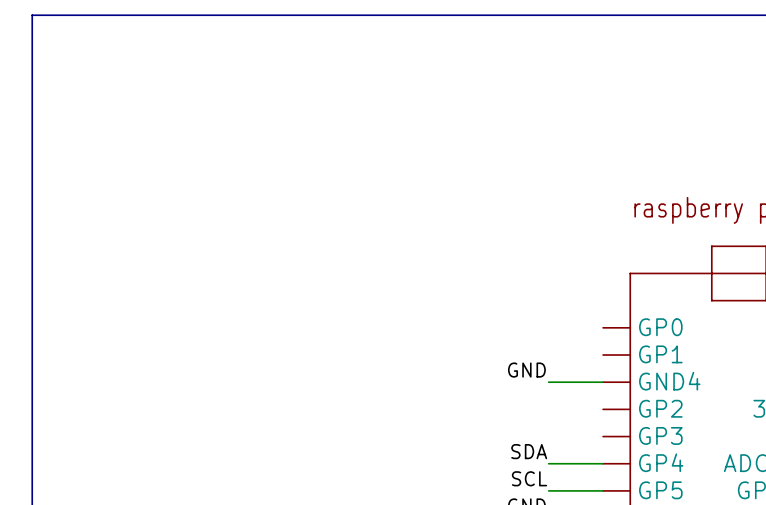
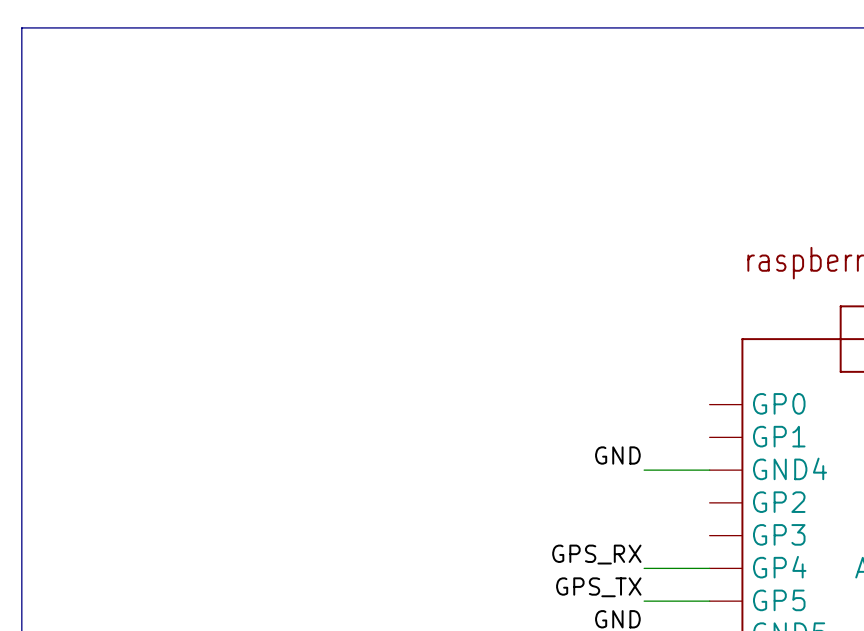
label: SDA (529, 451) -> GPS_RX (596, 554)
label: SCL (529, 478) -> GPS_TX (598, 587)

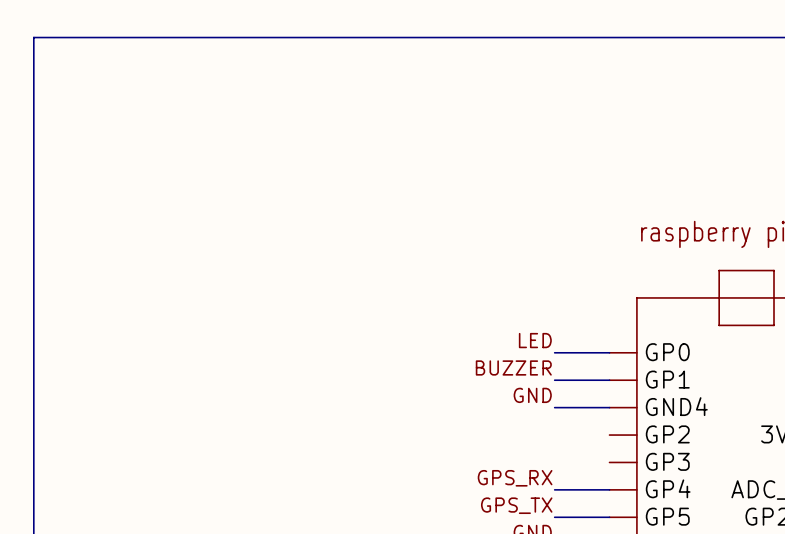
label: none -> LED (535, 340)
wire: none -> (554, 352) (609, 352)
label: none -> BUZZER (513, 367)
wire: none -> (554, 380) (609, 380)

